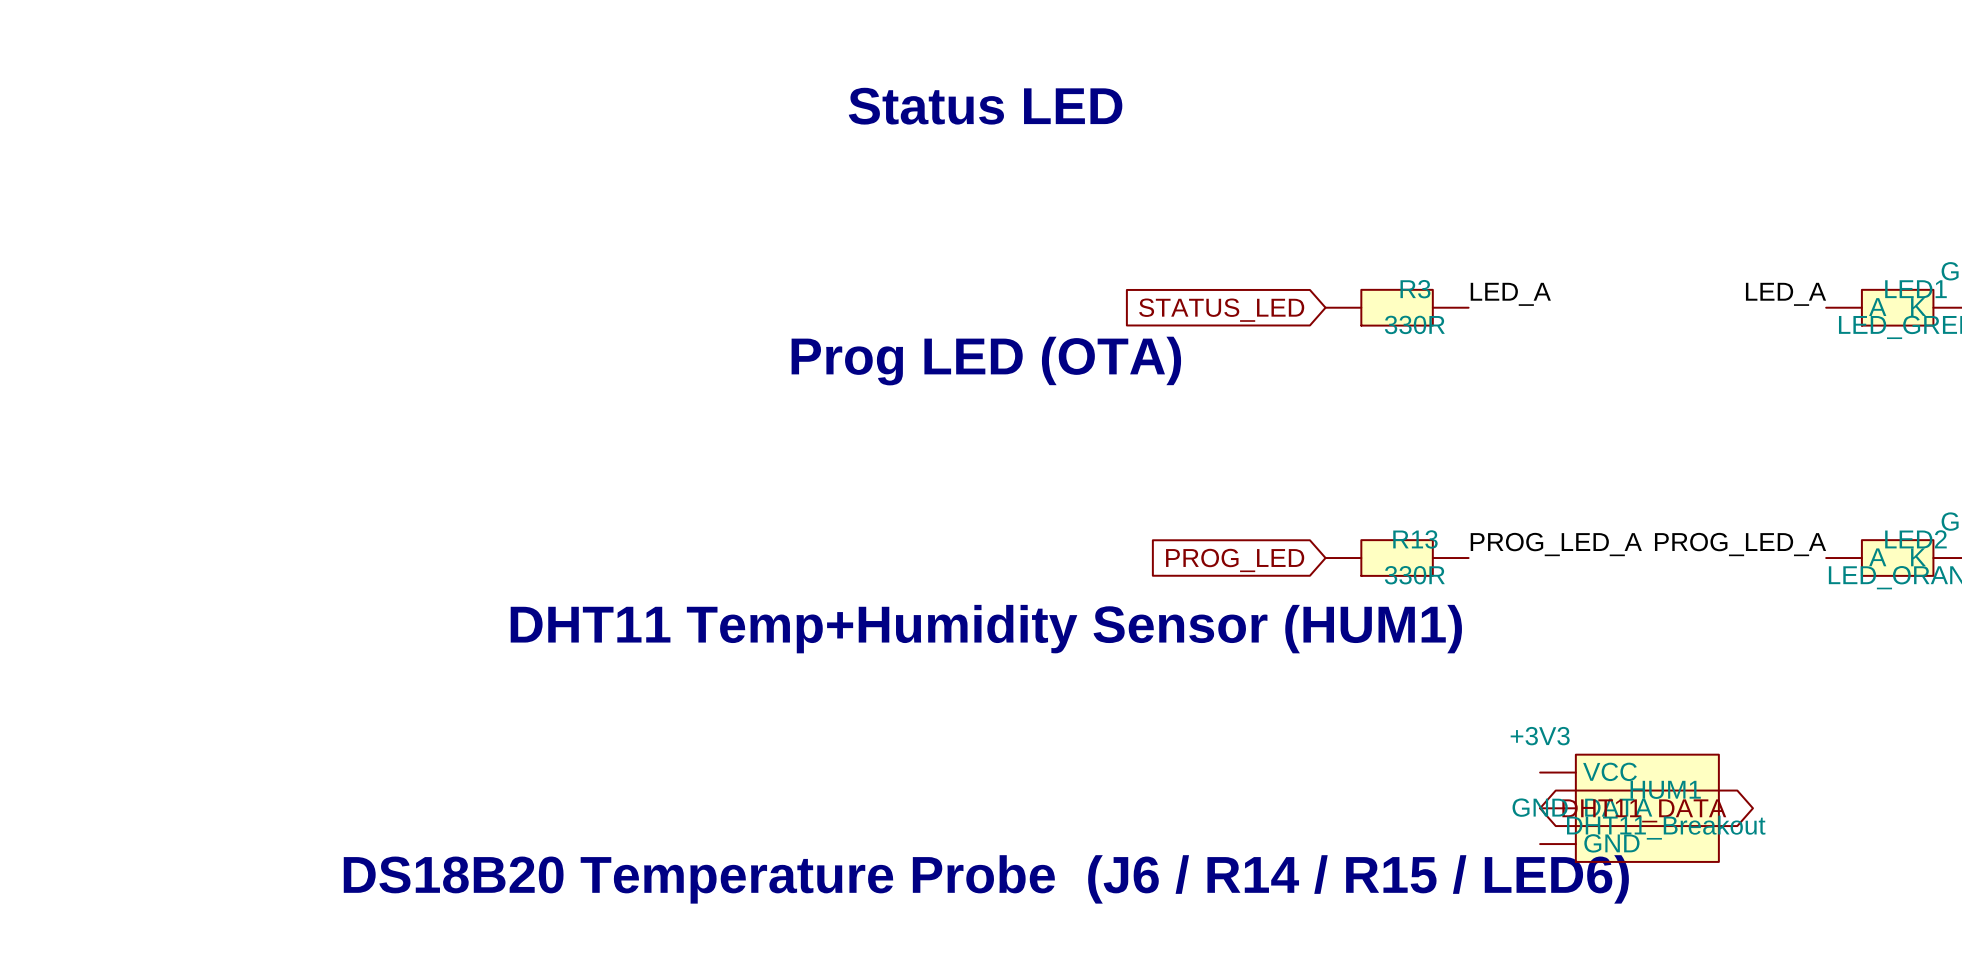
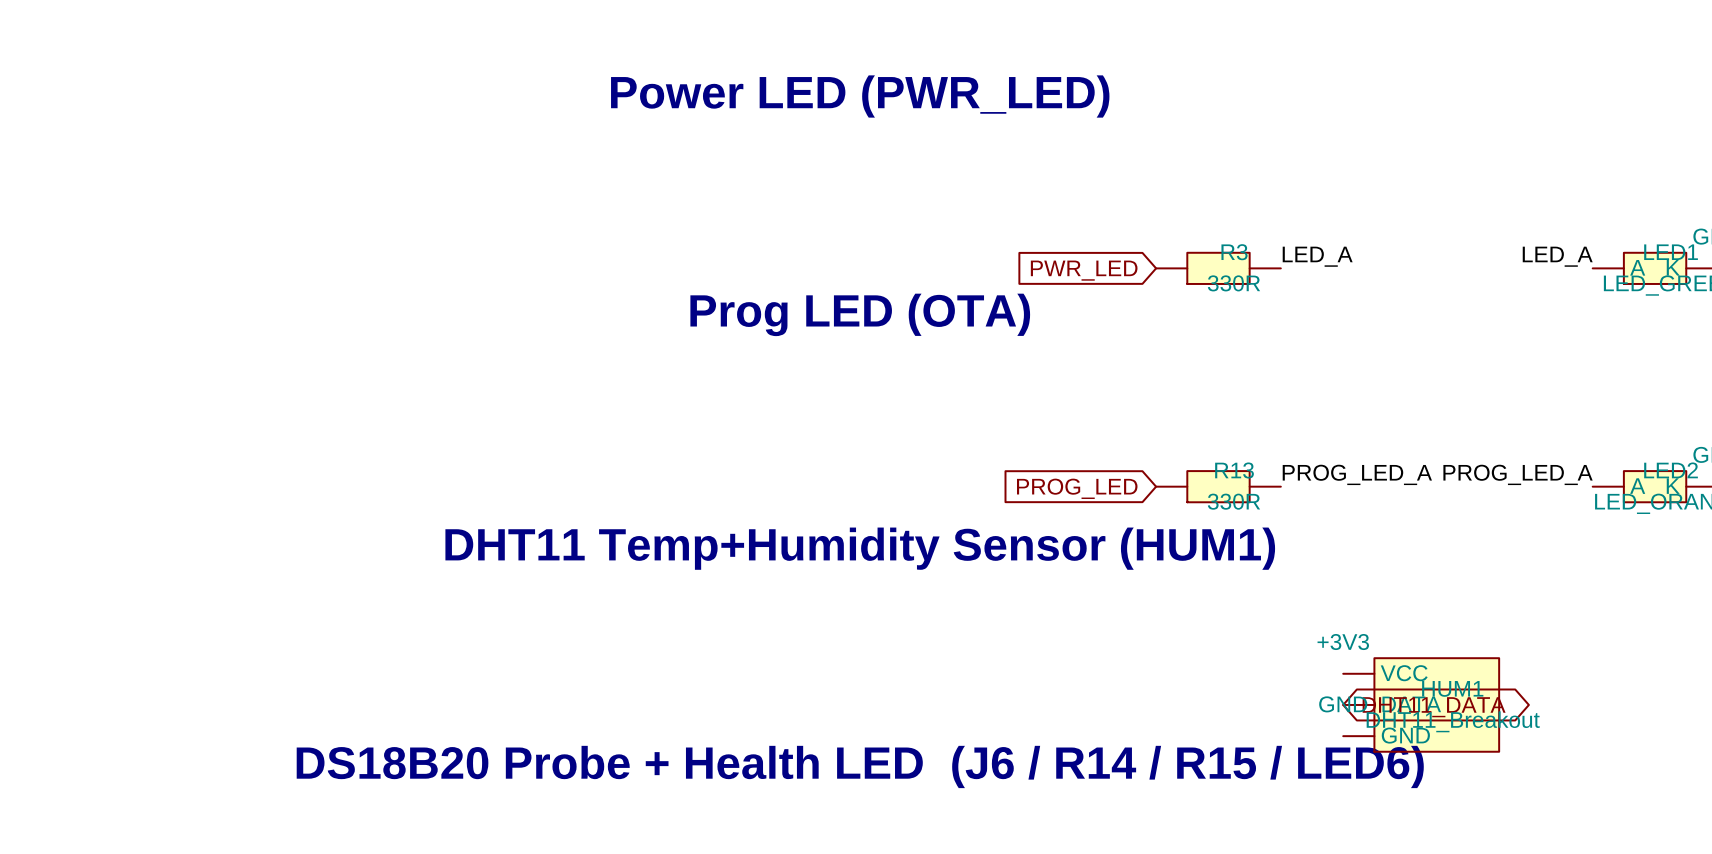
text: Status LED (985, 106) -> Power LED (PWR_LED) (860, 96)
global label: STATUS_LED (1221, 310) -> PWR_LED (1084, 270)
text: DS18B20 Temperature Probe (J6 / R14 / R15 / LED6) (986, 879) -> DS18B20 Probe + Health LED (J6 / R14 / R15 / LED6) (860, 766)

